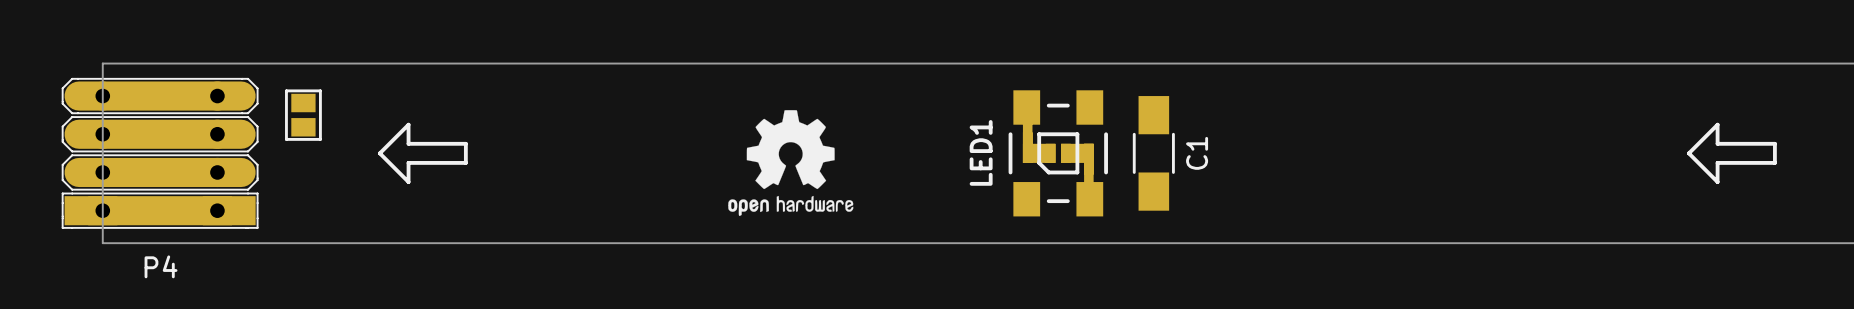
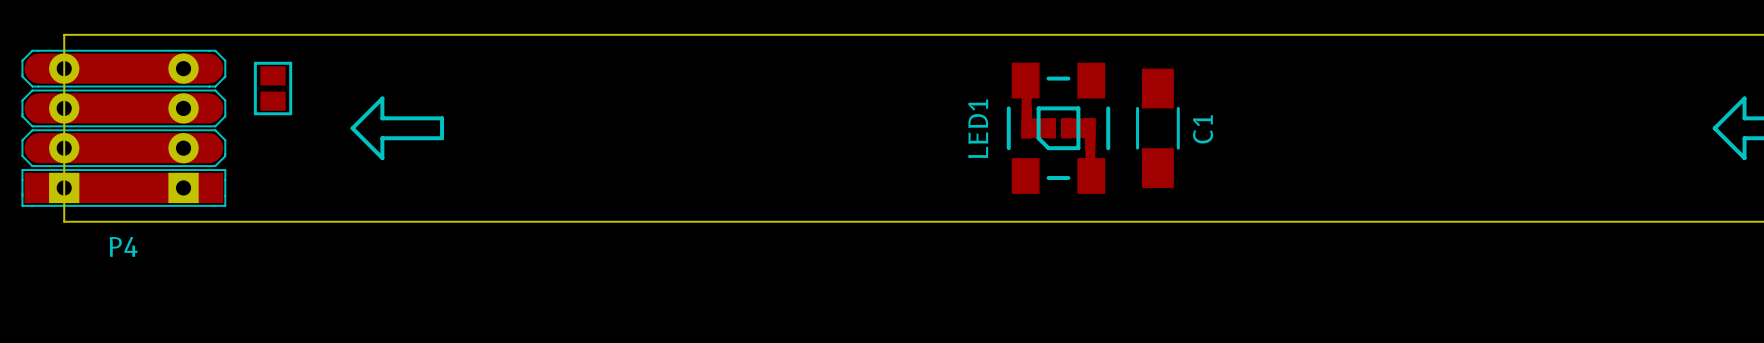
drawing: [728, 110, 854, 216] -> none

